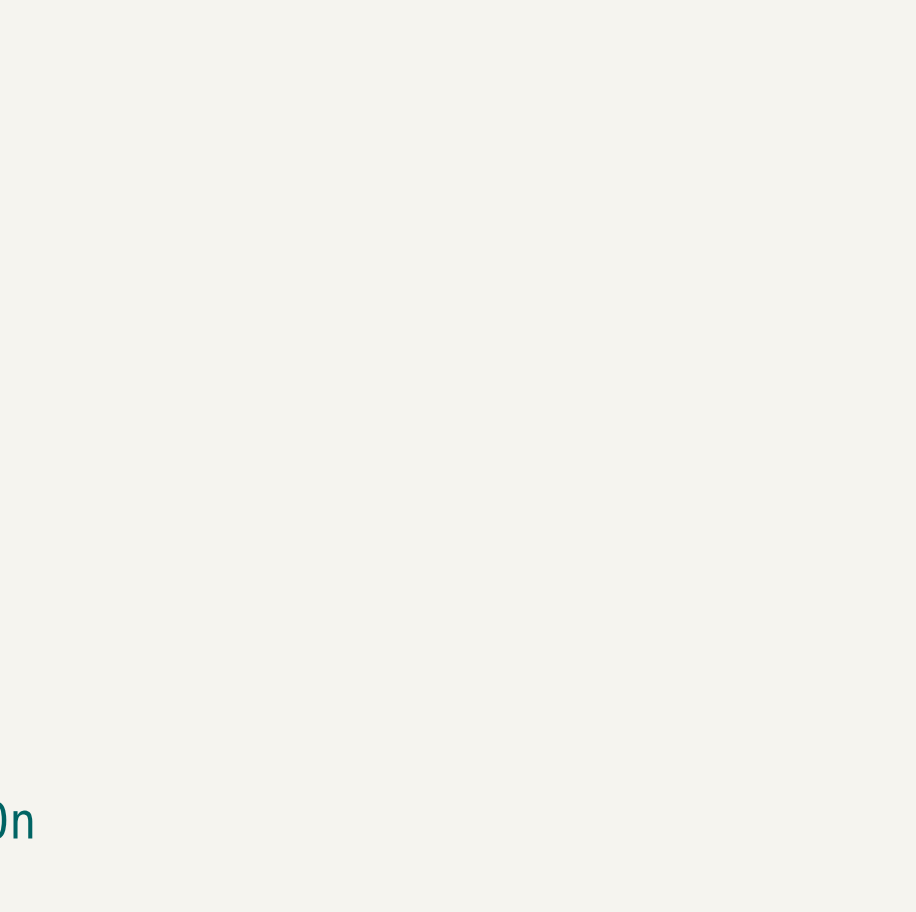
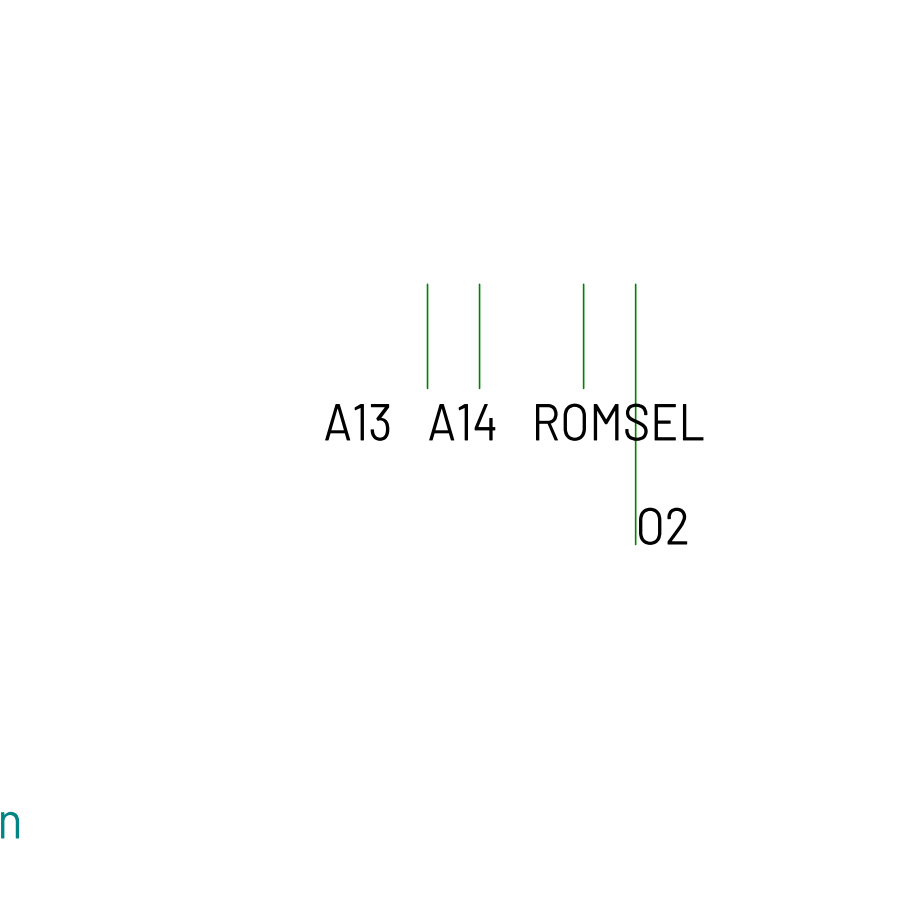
wire: none -> (427, 284) (427, 388)
wire: none -> (479, 284) (479, 388)
wire: none -> (583, 284) (583, 388)
wire: none -> (635, 284) (635, 544)
label: none -> A13 (357, 422)
label: none -> A14 (462, 422)
label: none -> ROMSEL (619, 422)
label: none -> O2 (663, 526)

